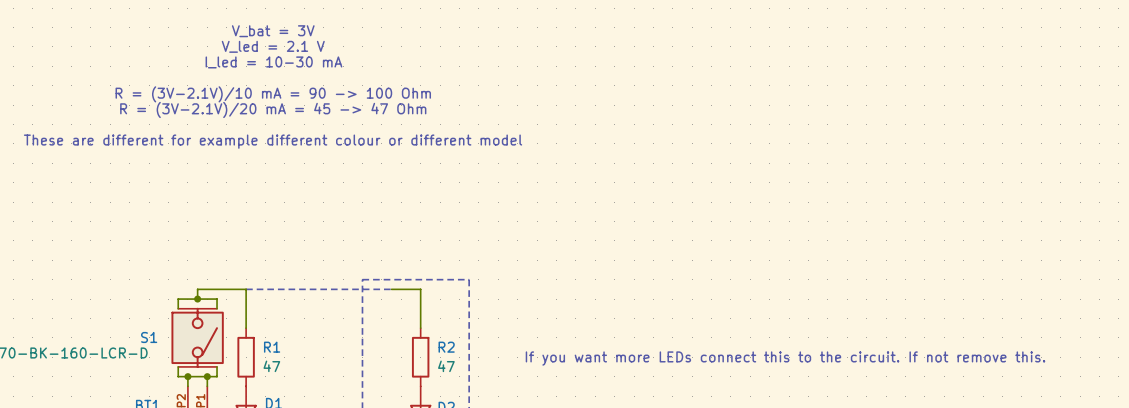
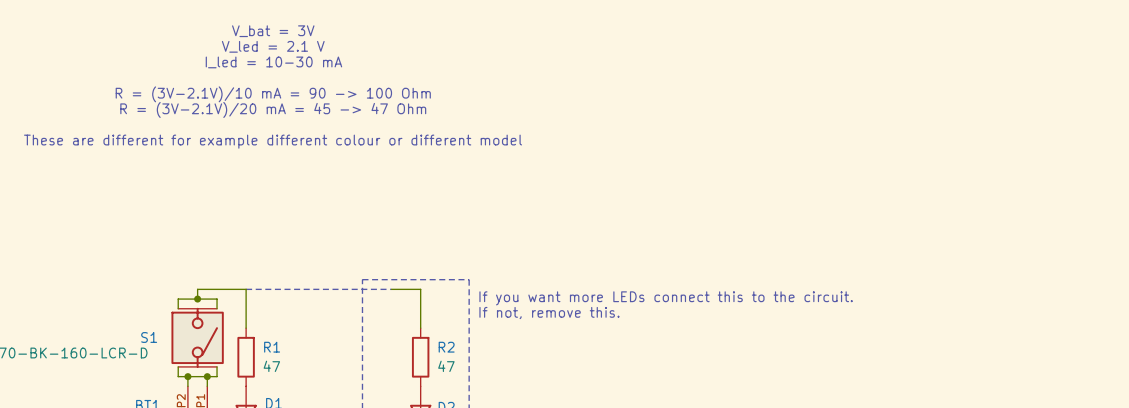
text: none -> If you want more LEDs connect this to the circuit. (666, 298)
text: none -> If not, remove this. (549, 313)
text: If you want more LEDs connect this to the circuit. If not remove this. (785, 358) -> none

